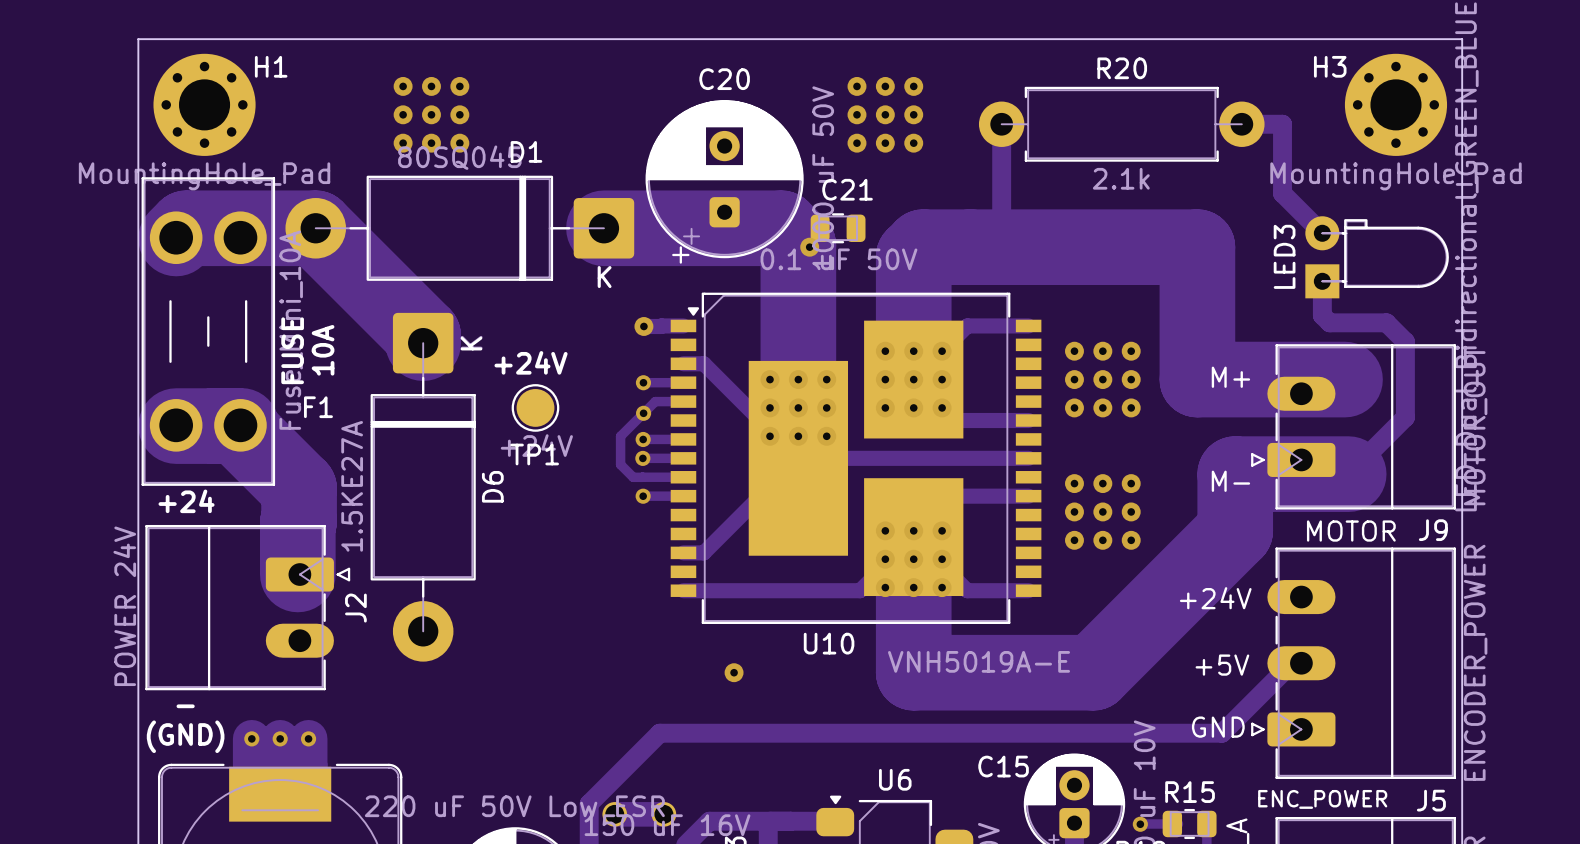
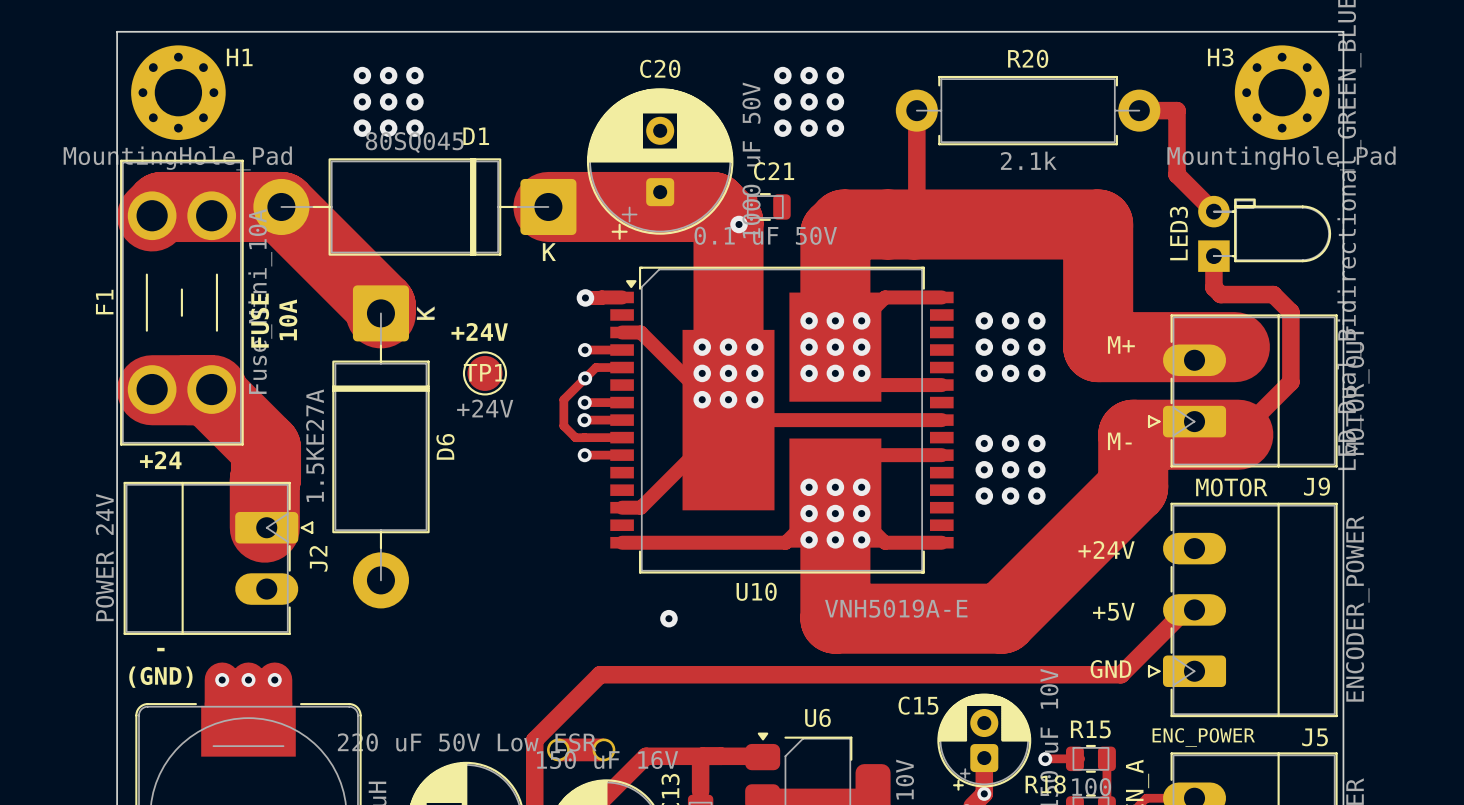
F1 name rotation: 0° (318, 407) -> 90° counterclockwise (104, 302)
F1 name position: F1 (318, 407) -> F1 (104, 302)
TP1 name position: TP1 (534, 454) -> TP1 (484, 372)

